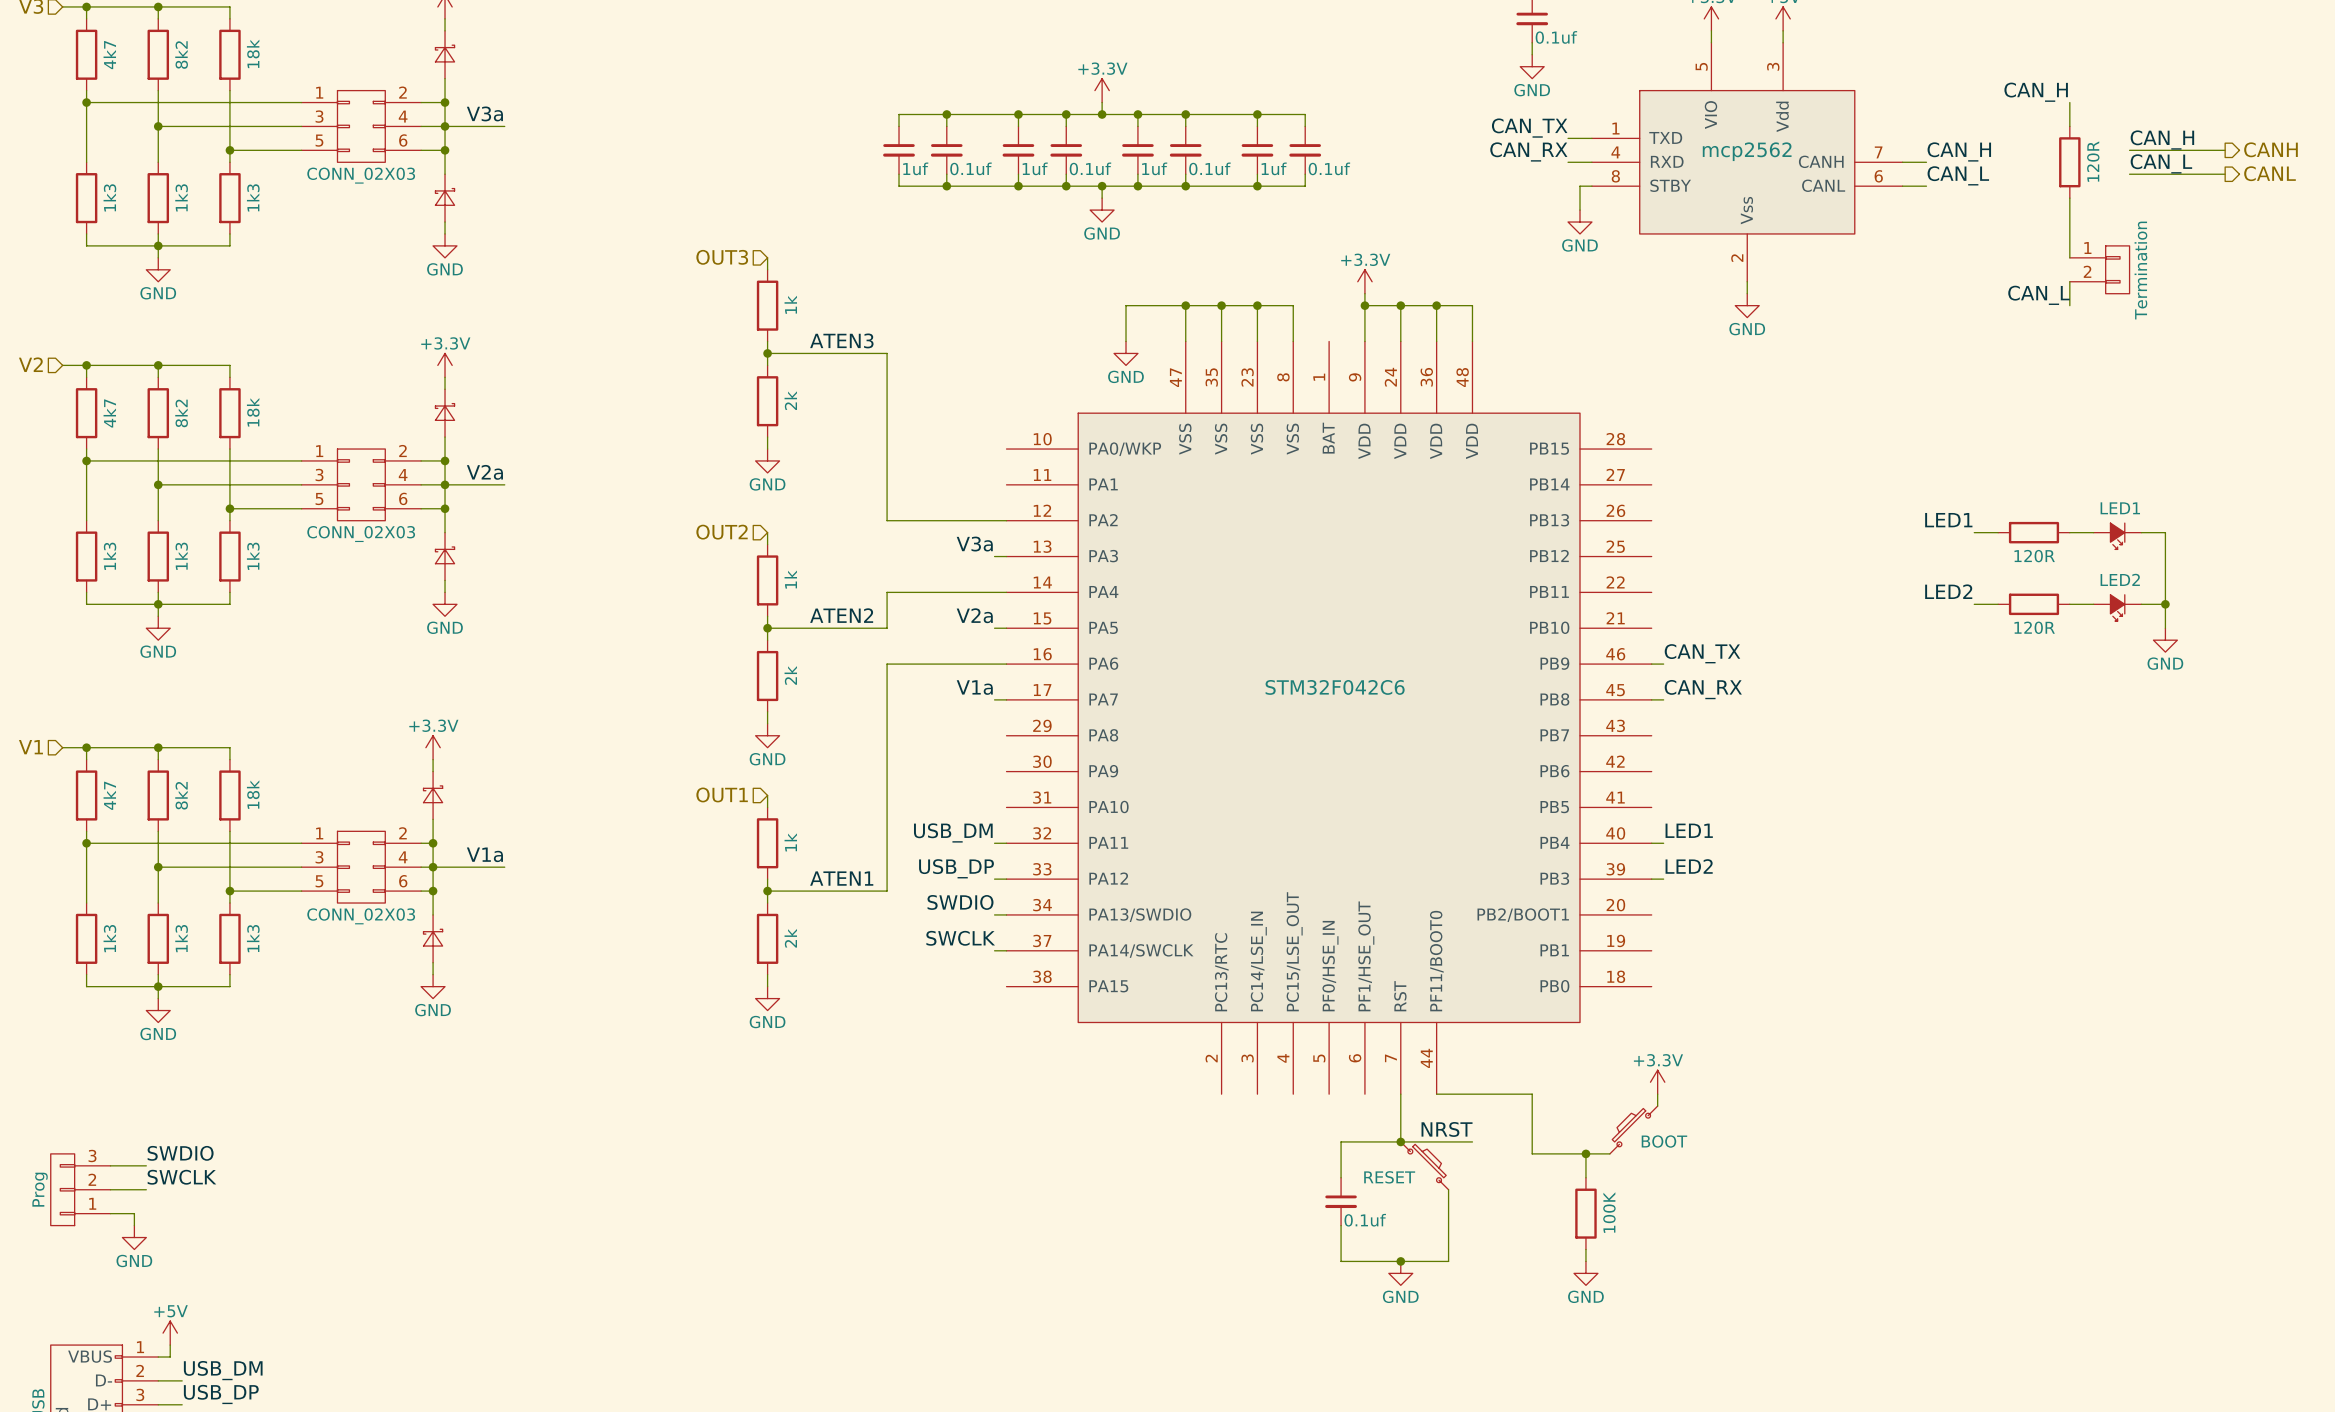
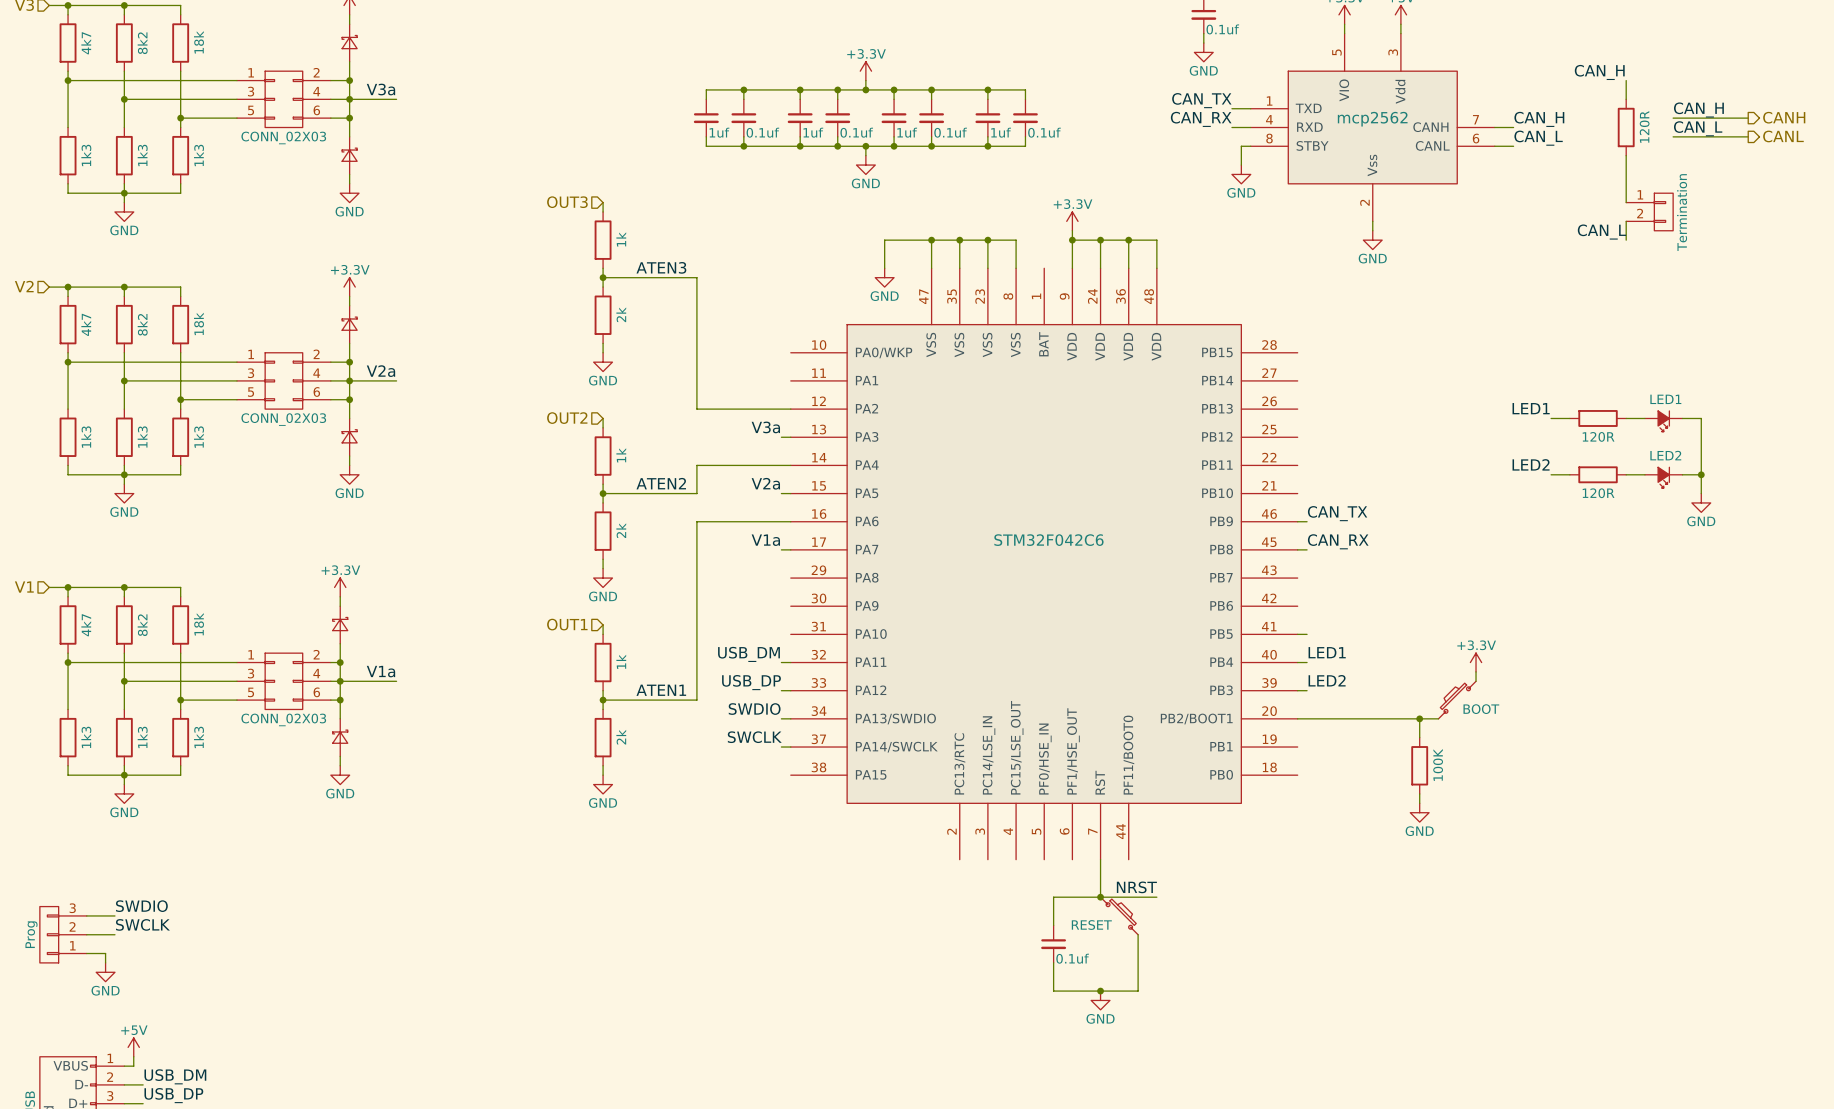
wire: none -> (1297, 634) (1307, 634)
power symbol: none -> +3.3V (1476, 662)
wire: none -> (1476, 671) (1476, 681)
part: none -> BOOT (1457, 700)
wire: none -> (1297, 718) (1438, 718)
wire: none -> (1419, 718) (1419, 737)
junction: none -> (1419, 718)
part: none -> 100K (1419, 765)
power symbol: none -> GND (1419, 812)
power symbol: +3.3V (1657, 1082) -> none
wire: (1436, 1094) (1532, 1094) (1532, 1153) (1609, 1153) -> none
wire: (1657, 1094) (1657, 1106) -> (1419, 793) (1419, 803)
part: BOOT (1633, 1130) -> none
wire: (1585, 1153) (1585, 1177) -> none
junction: (1585, 1153) -> none
part: 100K (1585, 1213) -> none
wire: (1585, 1249) (1585, 1261) -> none
power symbol: GND (1585, 1273) -> none

